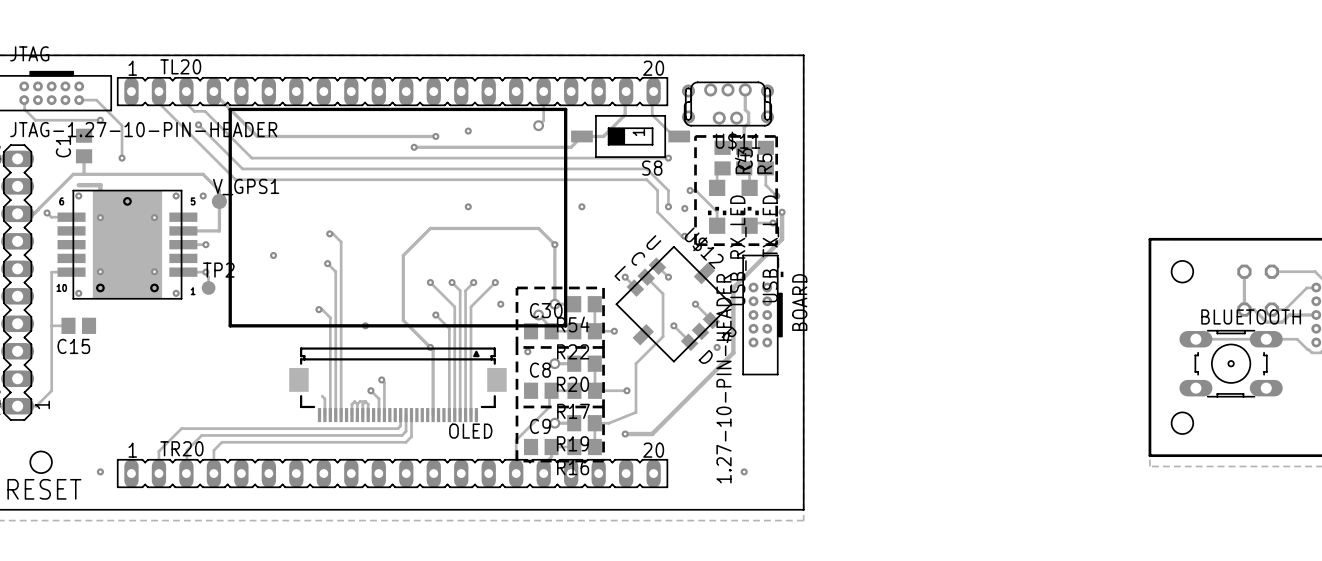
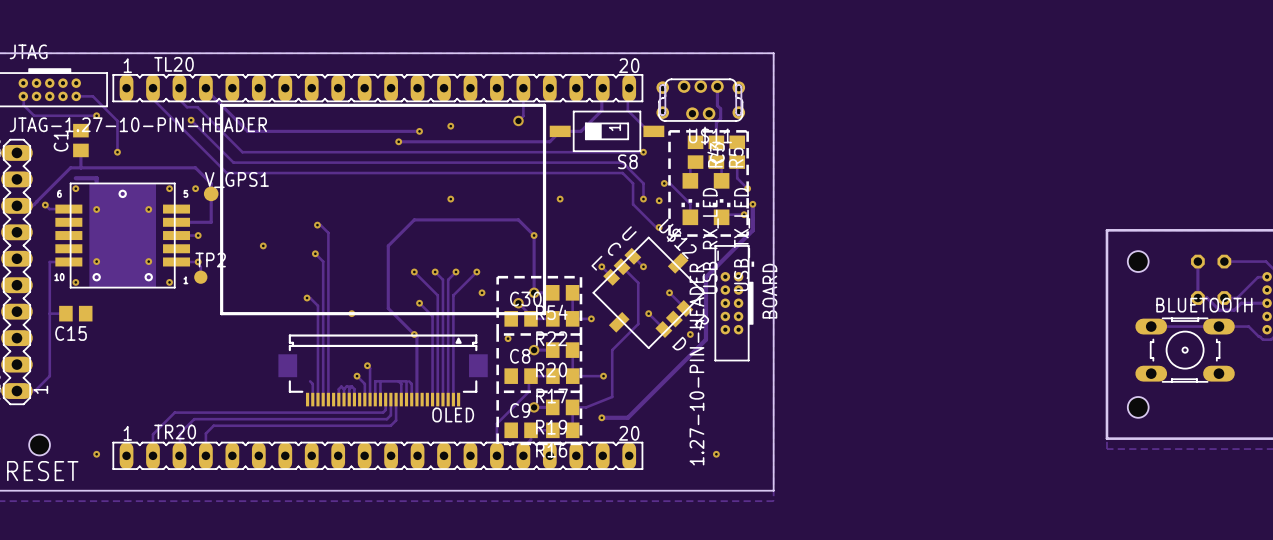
track: none -> (380, 381) (380, 399)
track: none -> (398, 381) (401, 383) (401, 399)
track: none -> (409, 381) (411, 383) (411, 399)
track: none -> (375, 399) (375, 381) (406, 381) (406, 399)

